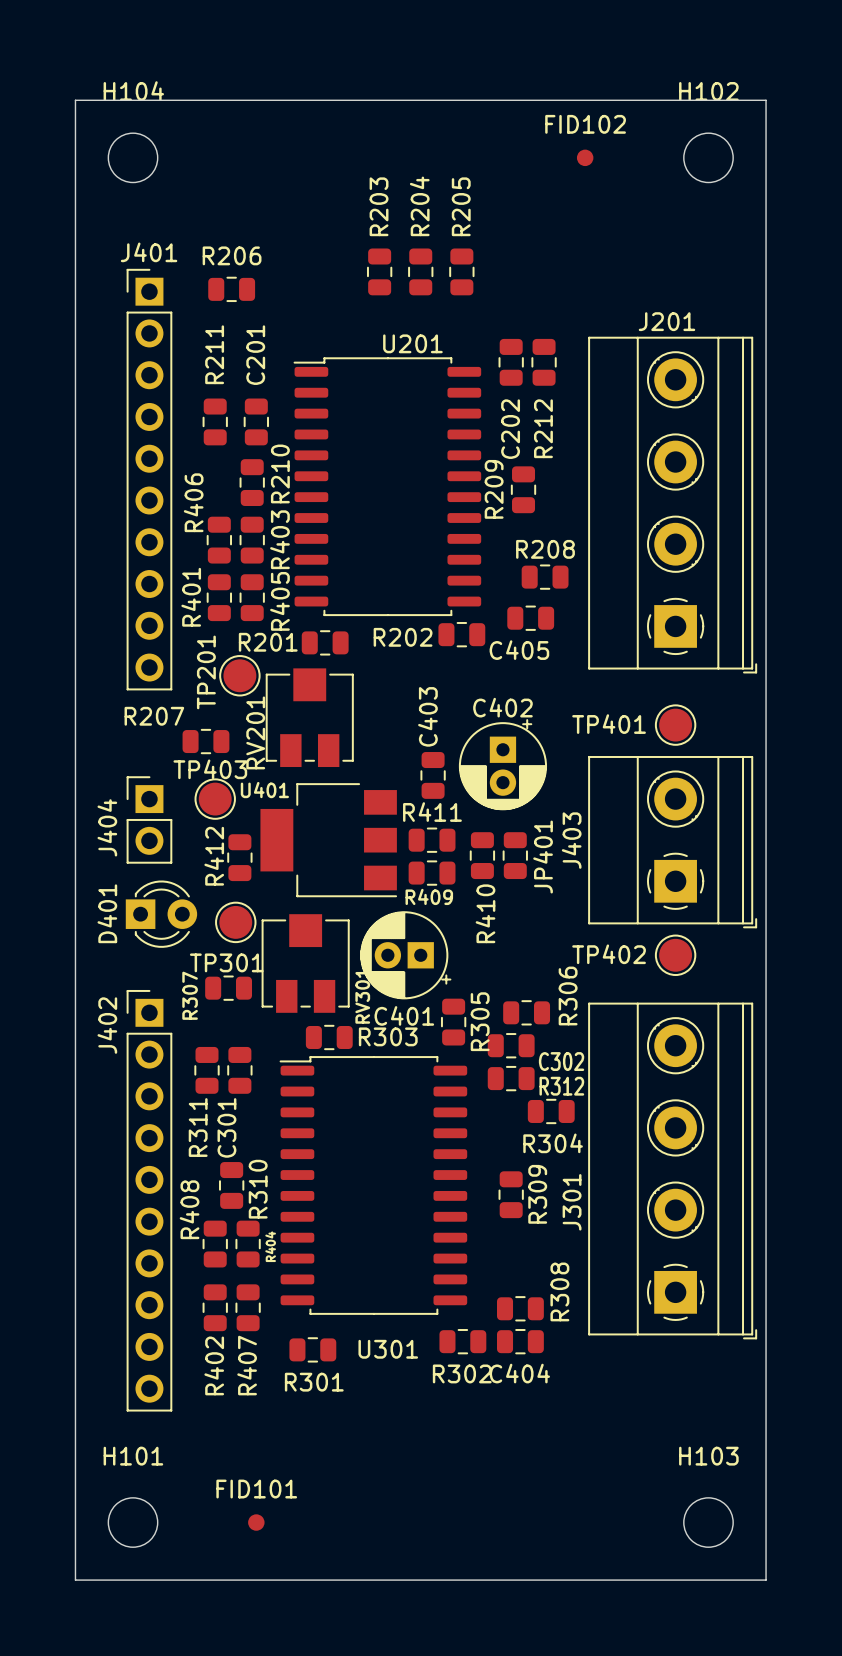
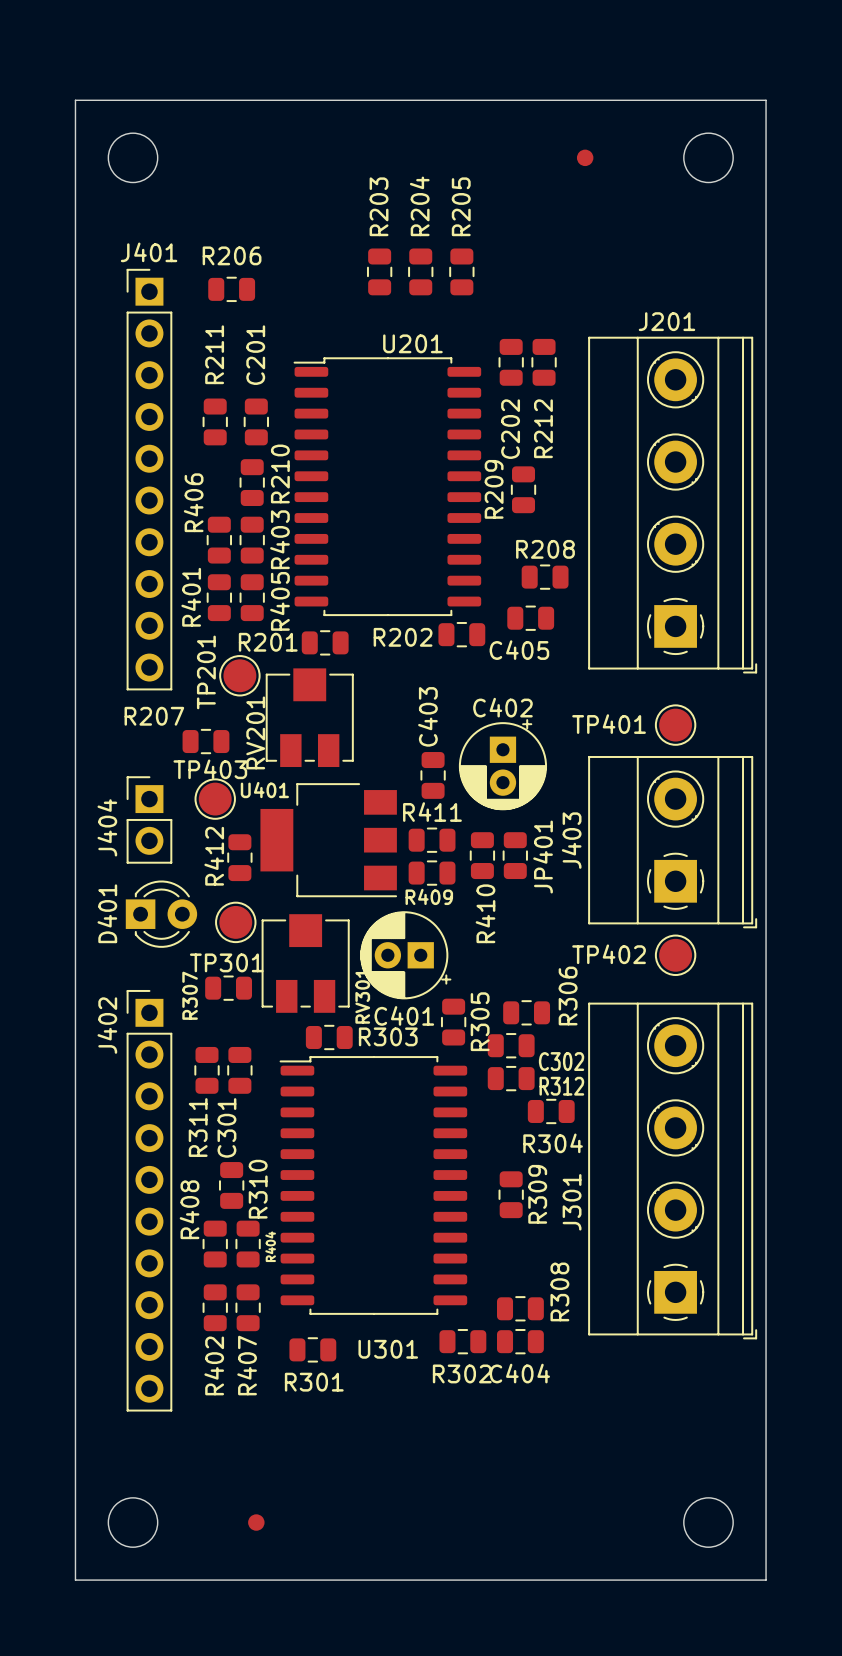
H104 name: H104 (133, 91) -> none
H102 name: H102 (708, 91) -> none
FID102 name: FID102 (585, 124) -> none
H101 name: H101 (133, 1456) -> none
H103 name: H103 (708, 1456) -> none
FID101 name: FID101 (256, 1489) -> none

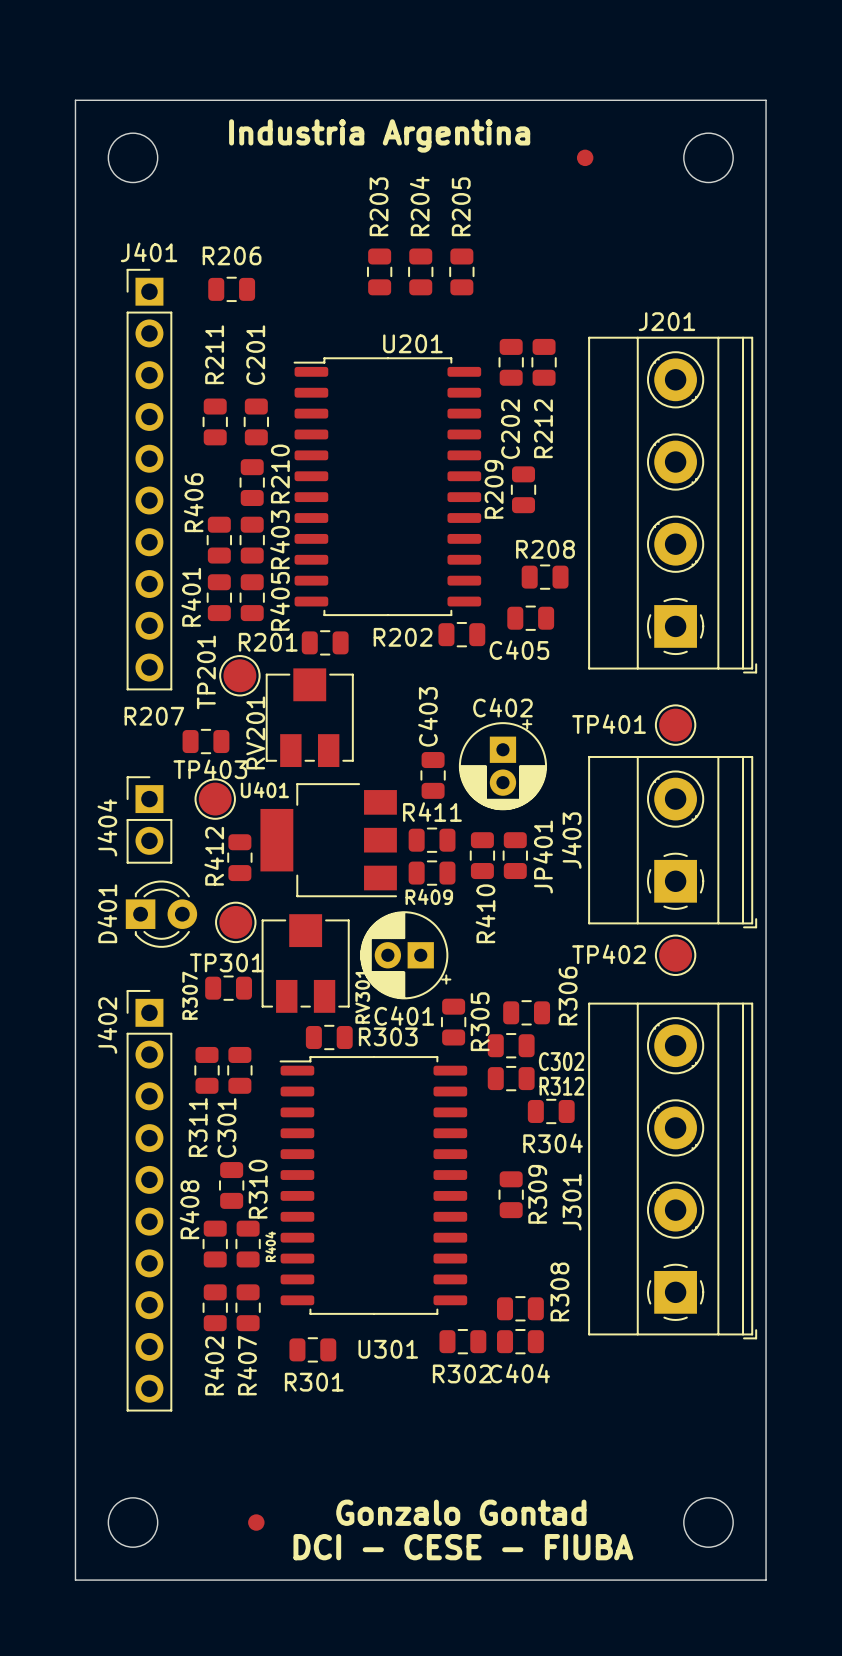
text: none -> Industria Argentina (379, 135)
text: none -> Gonzalo Gontad (461, 1512)
text: none -> DCI - CESE - FIUBA (463, 1547)

